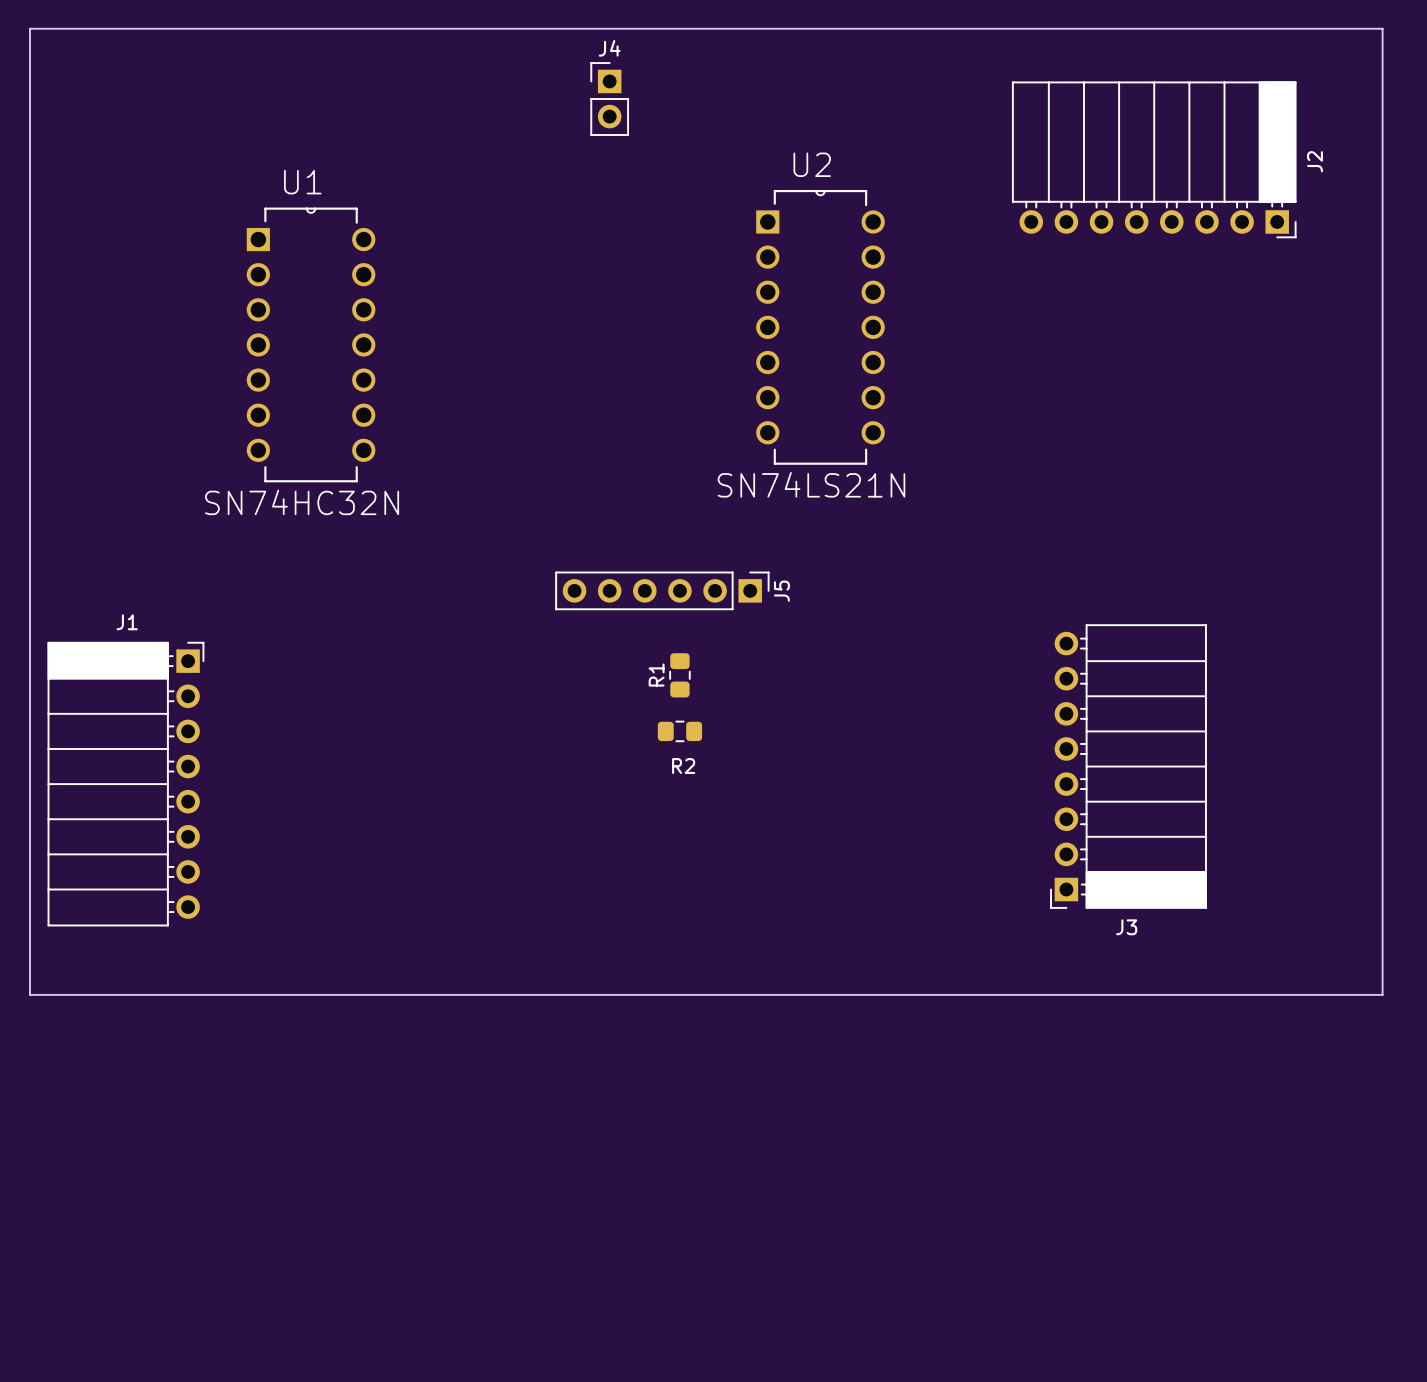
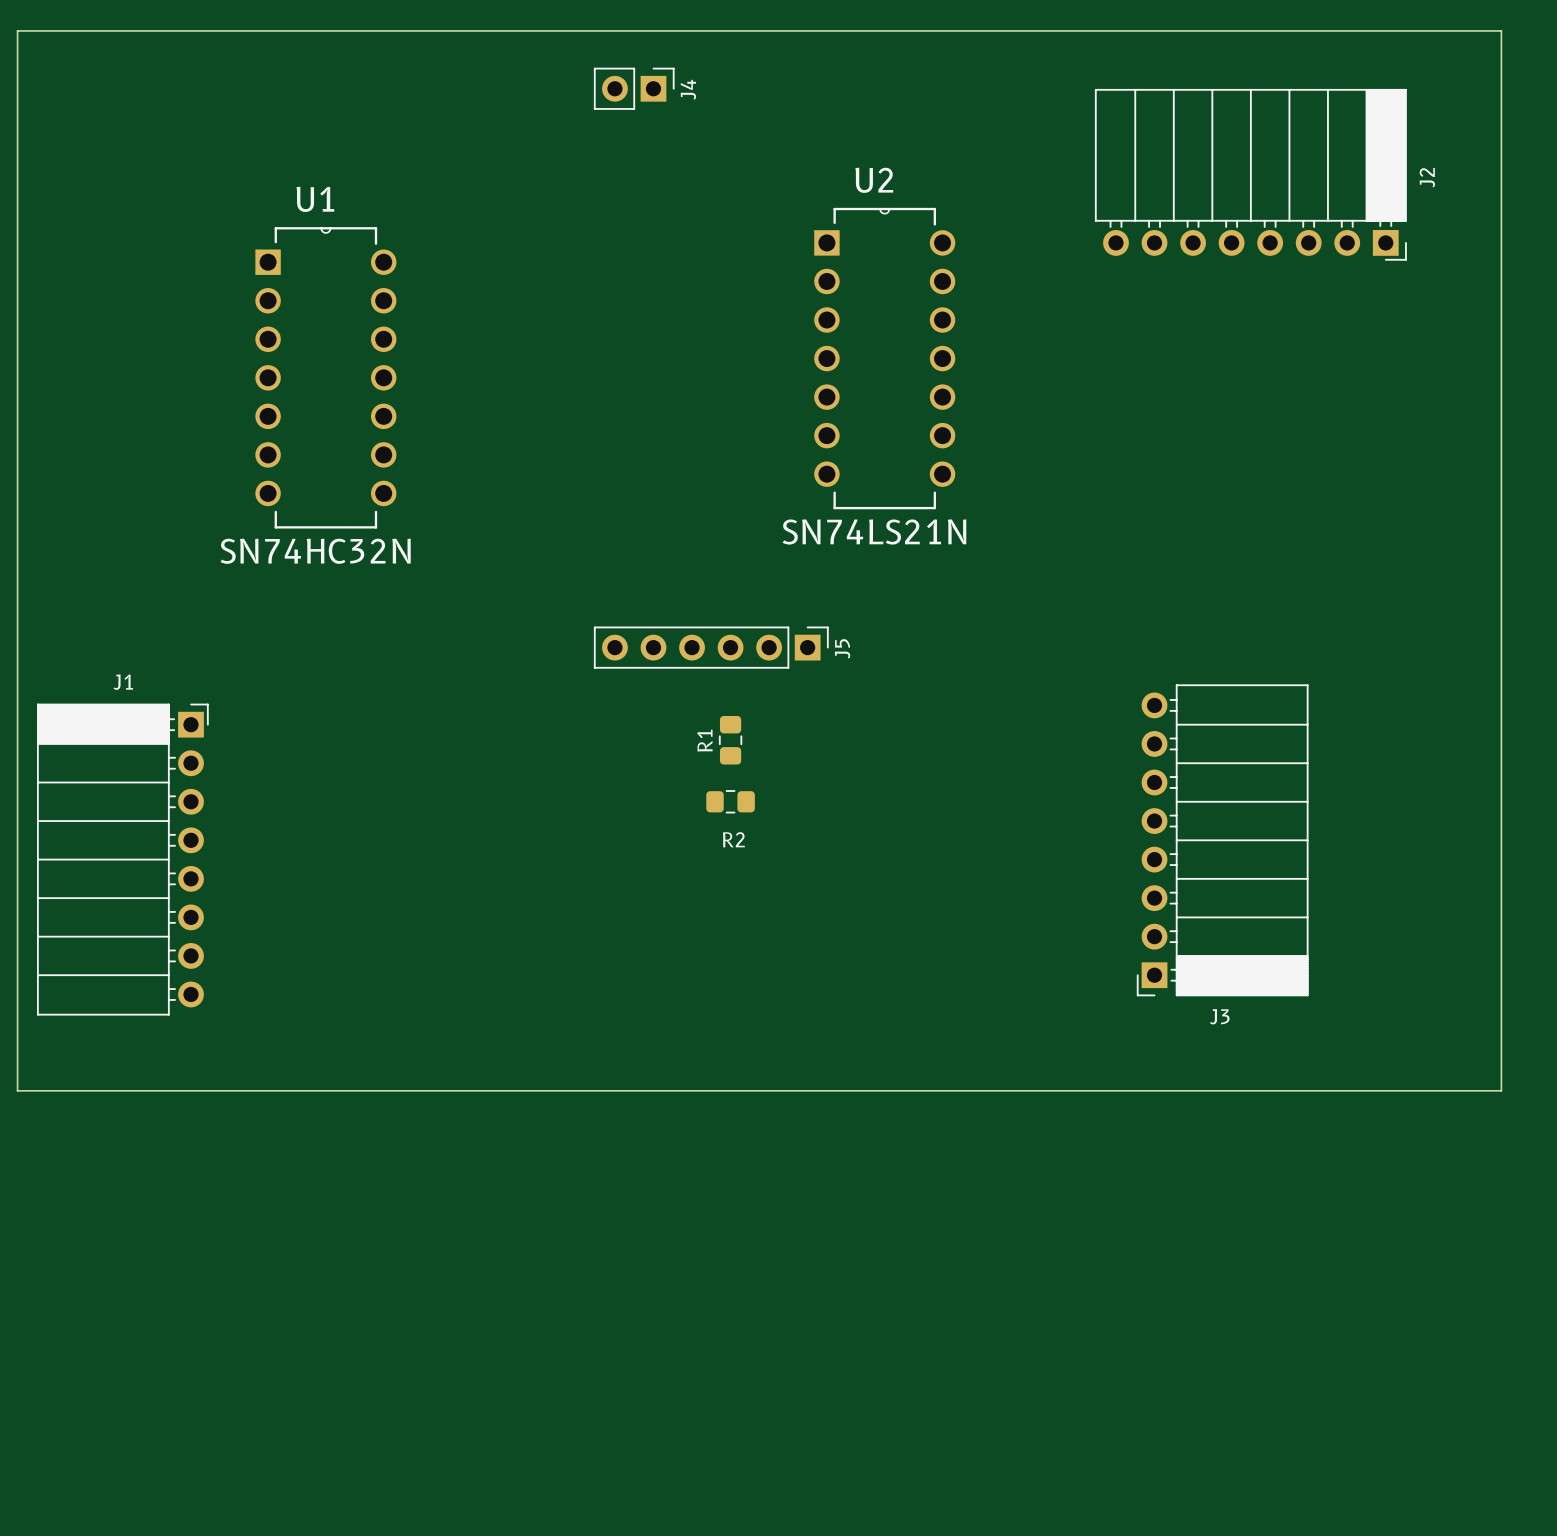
J4 rotation: 0° (609, 99) -> 90° clockwise (634, 88)

